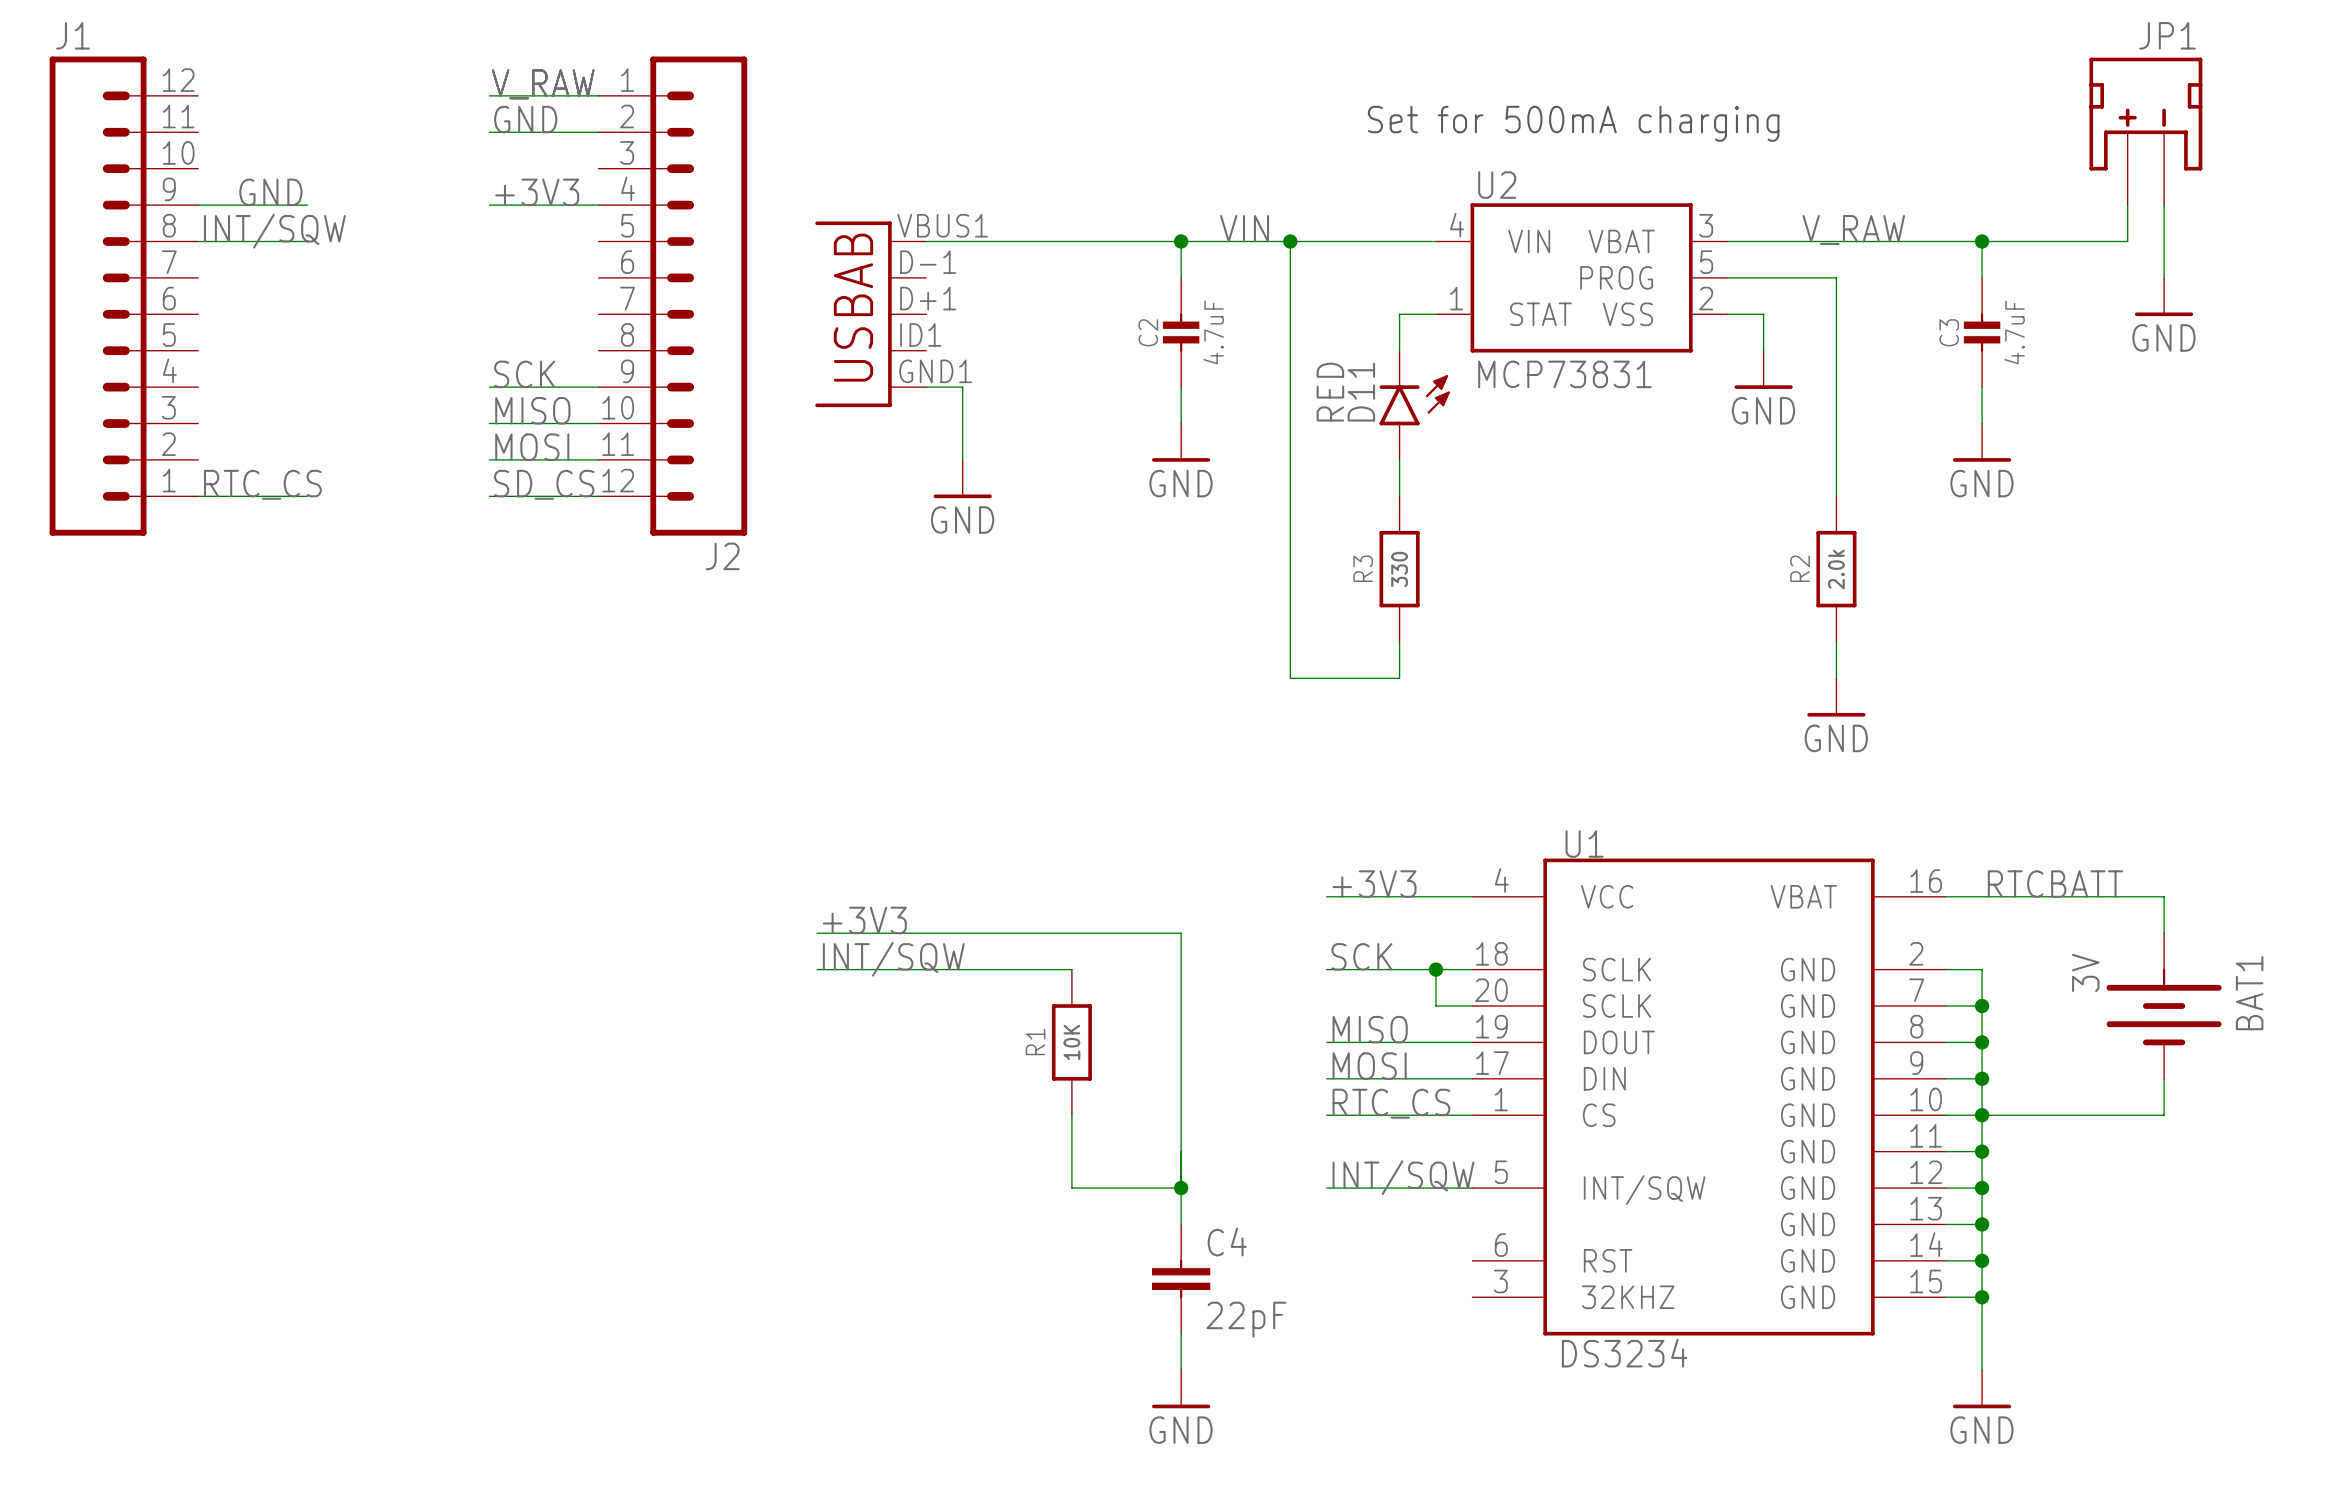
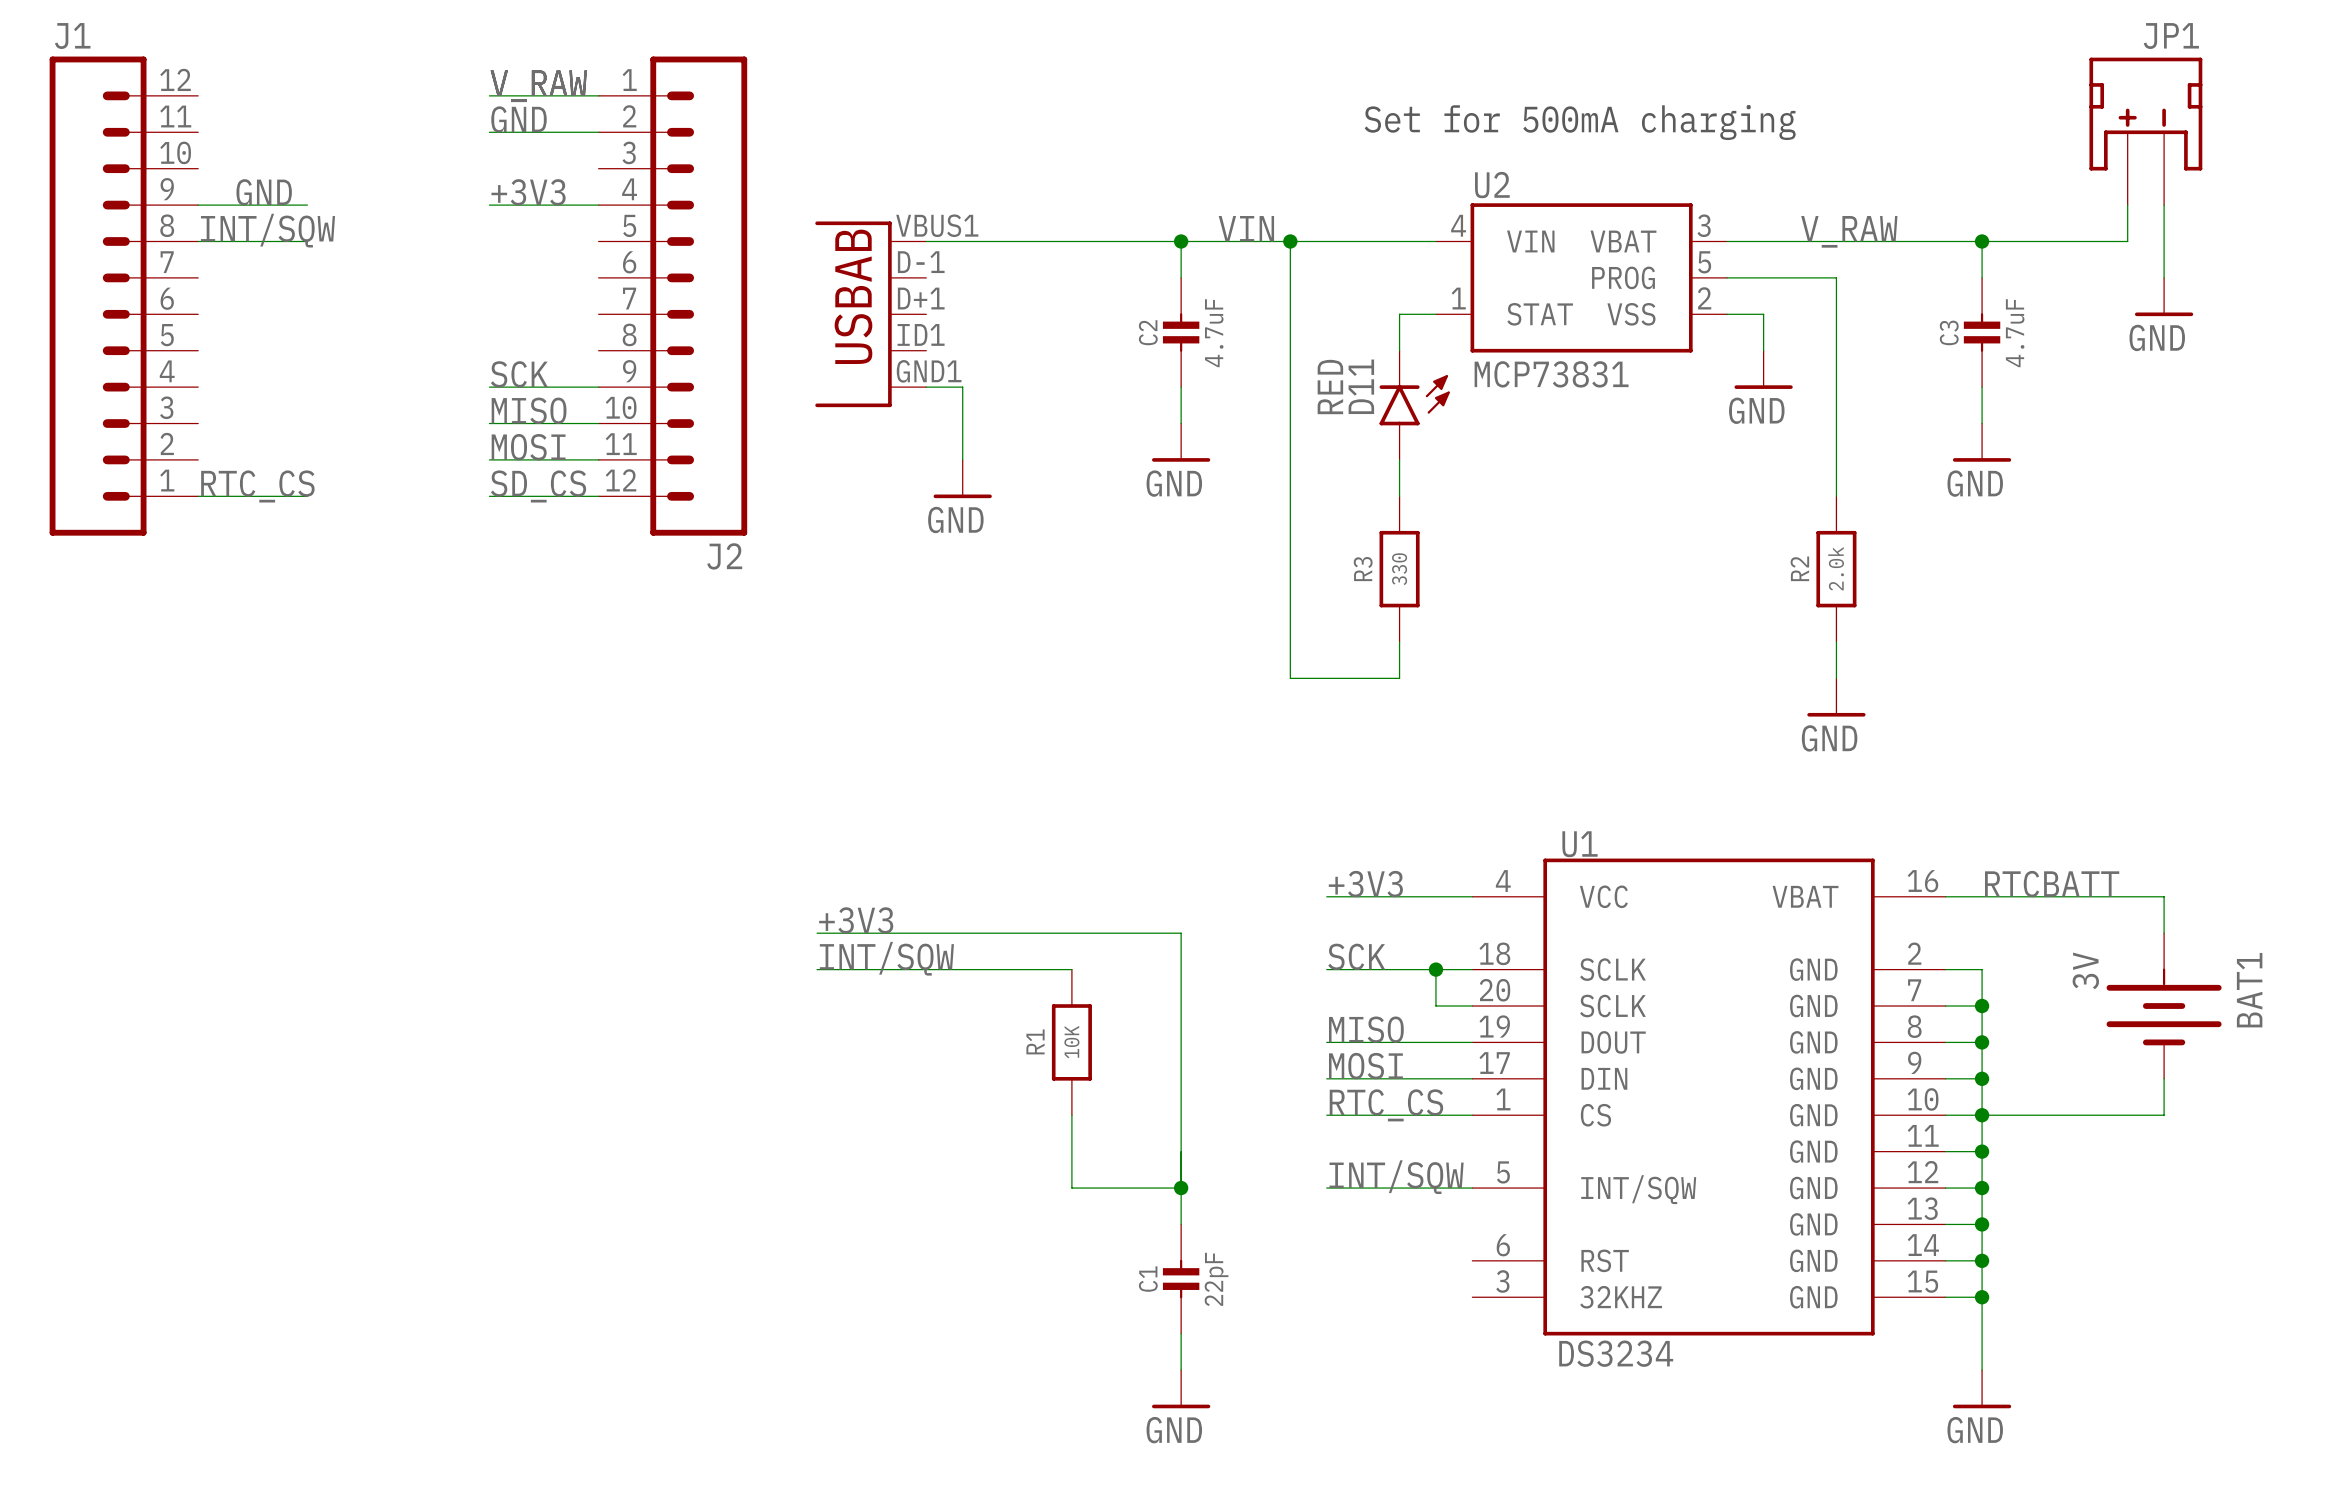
C4: 22pF (1181, 1279) -> none
C1: none -> 22pF (1181, 1279)

